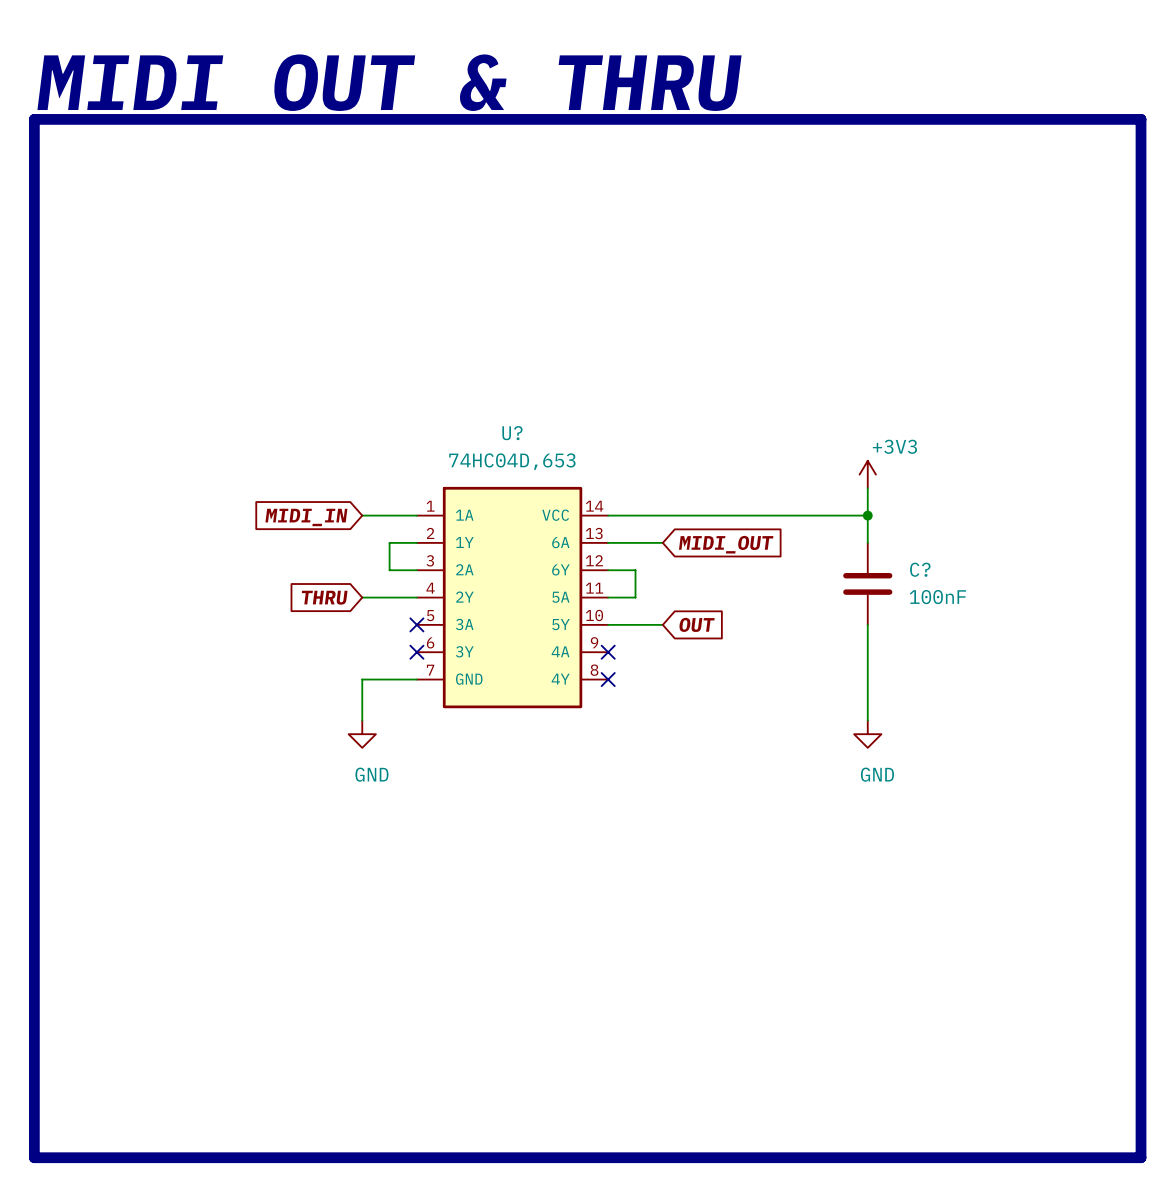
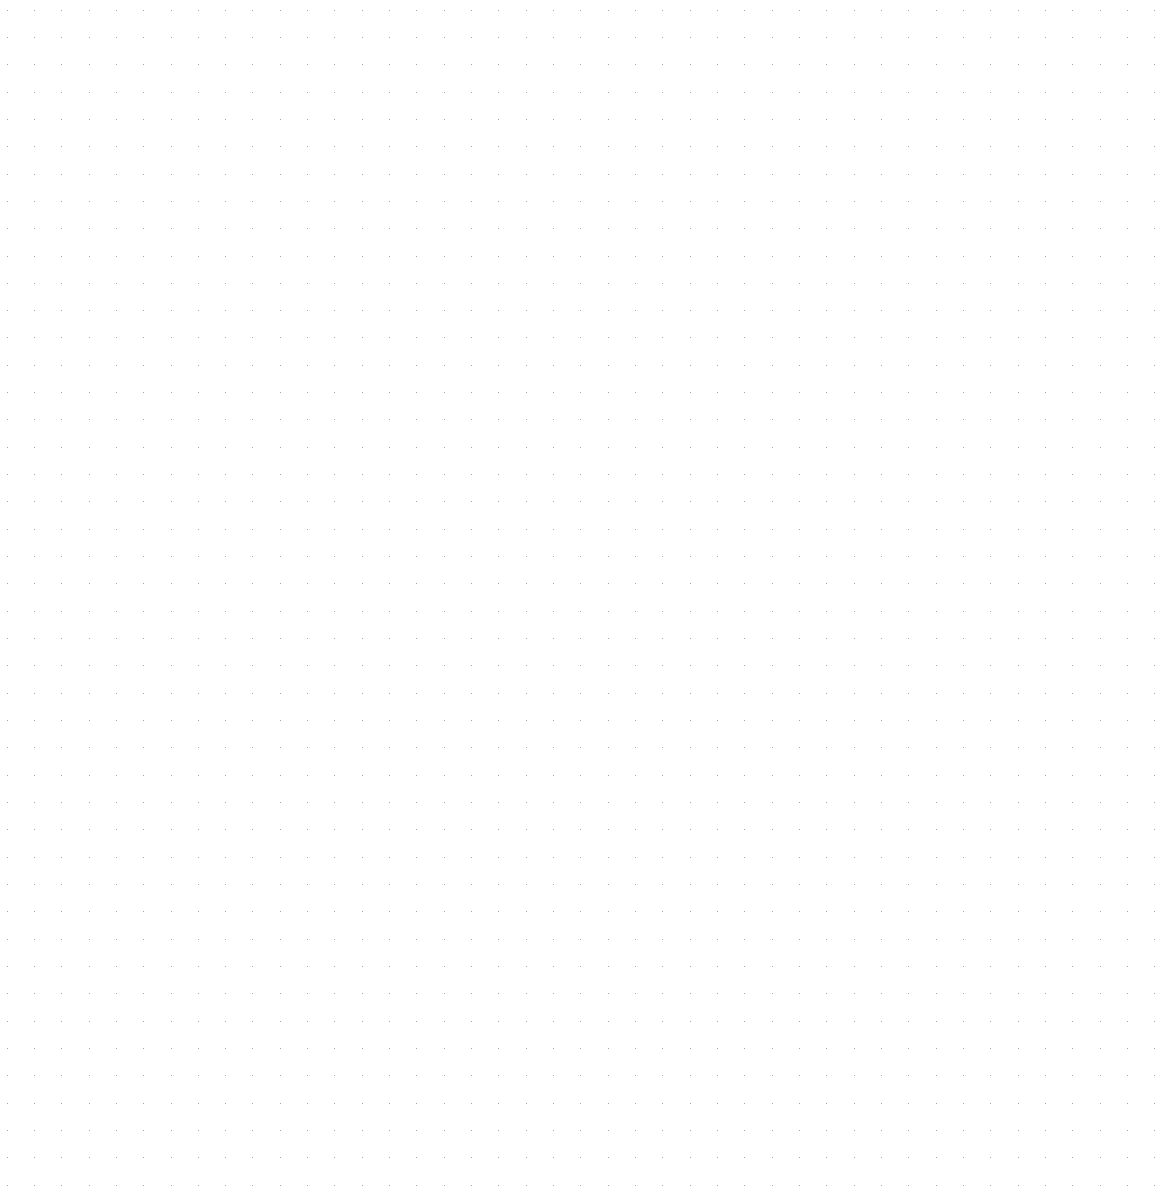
text: MIDI OUT & THRU (389, 82) -> none
line: (34, 119) (1141, 119) (1141, 1157) (34, 1157) (34, 119) -> none
power symbol: +3V3 (867, 474) -> none
wire: (867, 488) (867, 542) -> none
wire: (362, 515) (416, 515) -> none
wire: (608, 515) (867, 515) -> none
junction: (867, 515) -> none
global label: MIDI_IN (306, 517) -> none
wire: (416, 542) (389, 542) (389, 570) (416, 570) -> none
wire: (608, 542) (662, 542) -> none
global label: MIDI_OUT (726, 544) -> none
wire: (608, 570) (635, 570) (635, 597) (608, 597) -> none
C?: 100nF (867, 583) -> none
global label: THRU (324, 597) -> none
wire: (362, 597) (416, 597) -> none
U?: 74HC04D,653 (512, 597) -> none
no-connect mark: (416, 624) -> none
wire: (608, 624) (662, 624) -> none
global label: OUT (696, 624) -> none
wire: (867, 624) (867, 720) -> none
no-connect mark: (416, 652) -> none
no-connect mark: (608, 652) -> none
wire: (416, 679) (362, 679) (362, 720) -> none
no-connect mark: (608, 679) -> none
power symbol: GND (362, 734) -> none
power symbol: GND (867, 734) -> none

